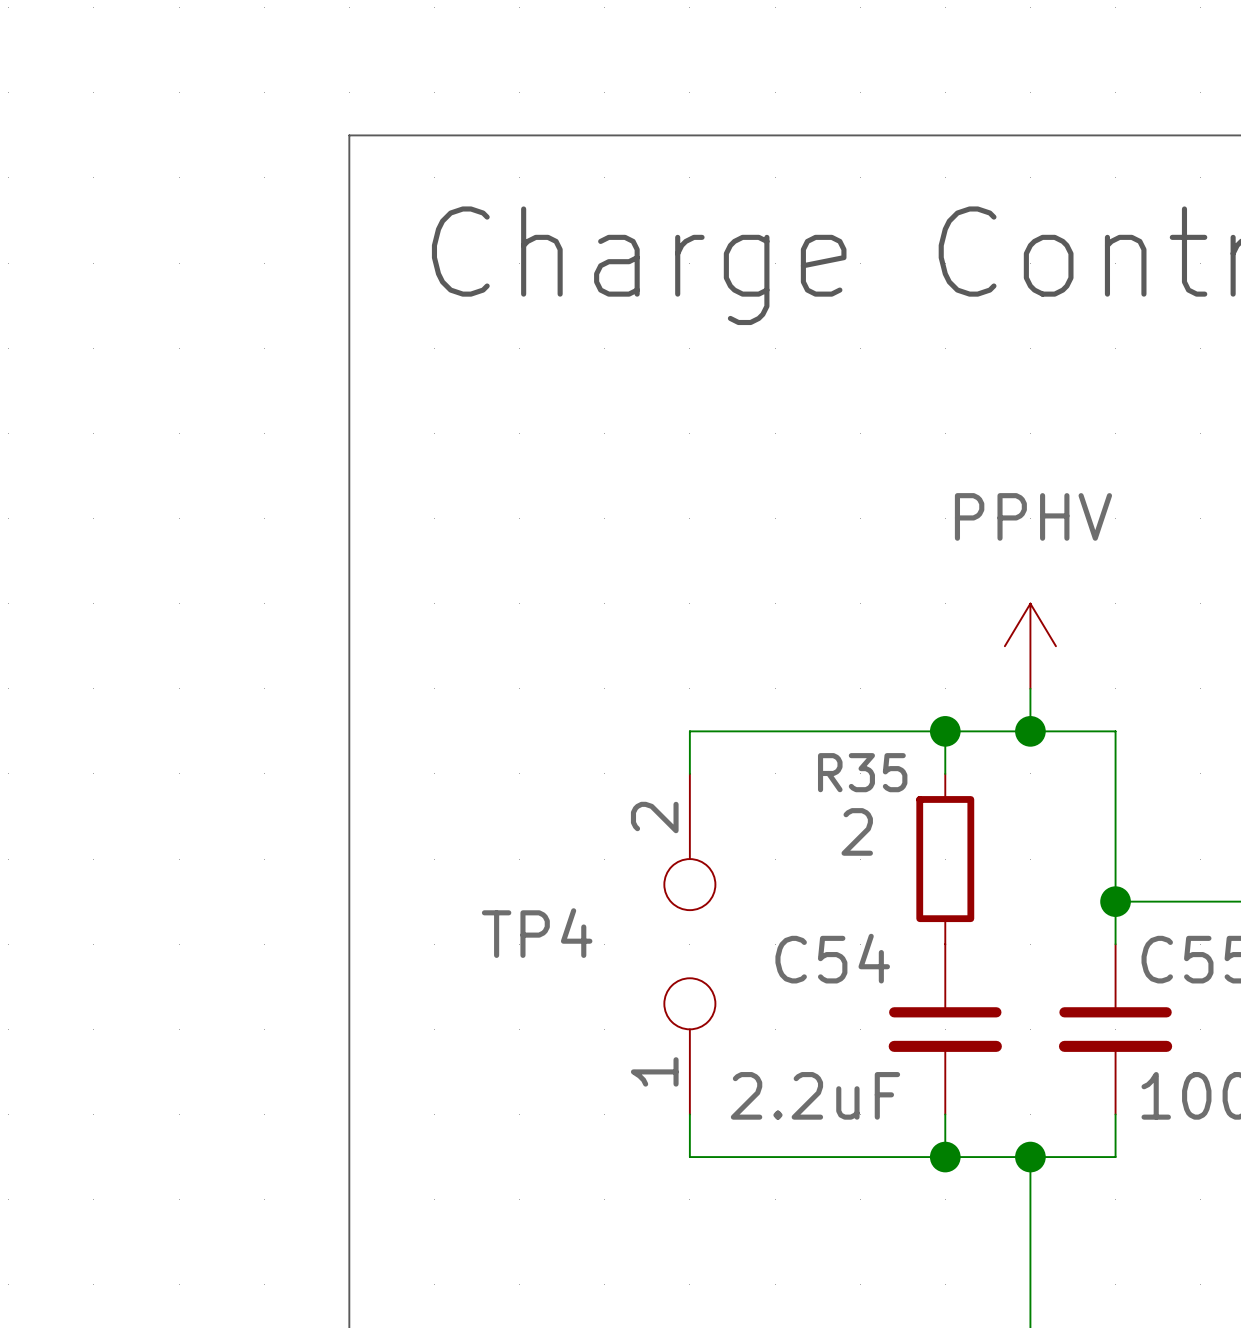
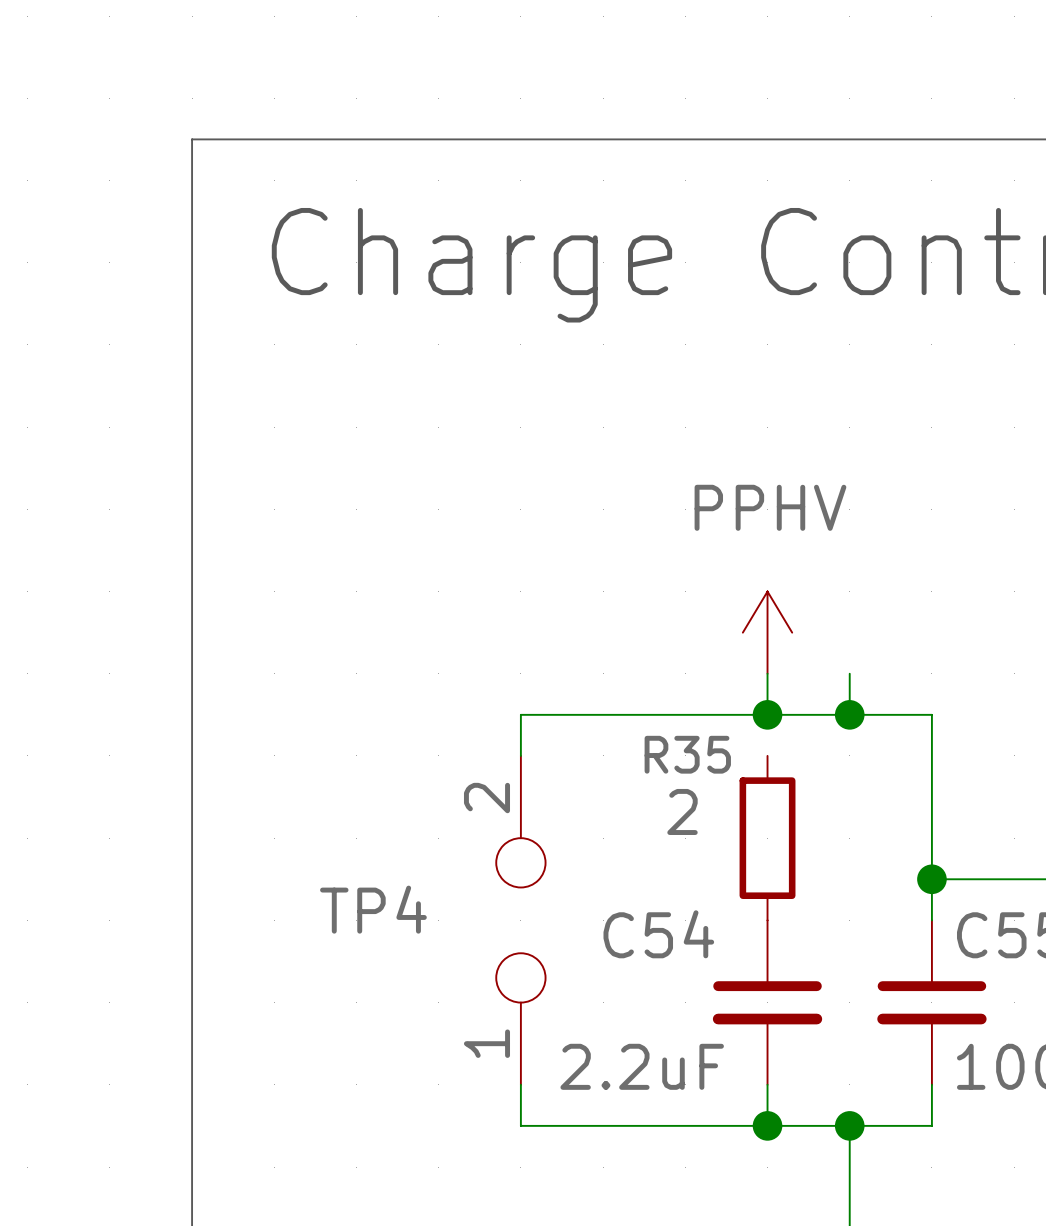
power symbol position: PPHV (1030, 646) -> PPHV (767, 632)
wire: (945, 731) (945, 773) -> (767, 714) (767, 673)

